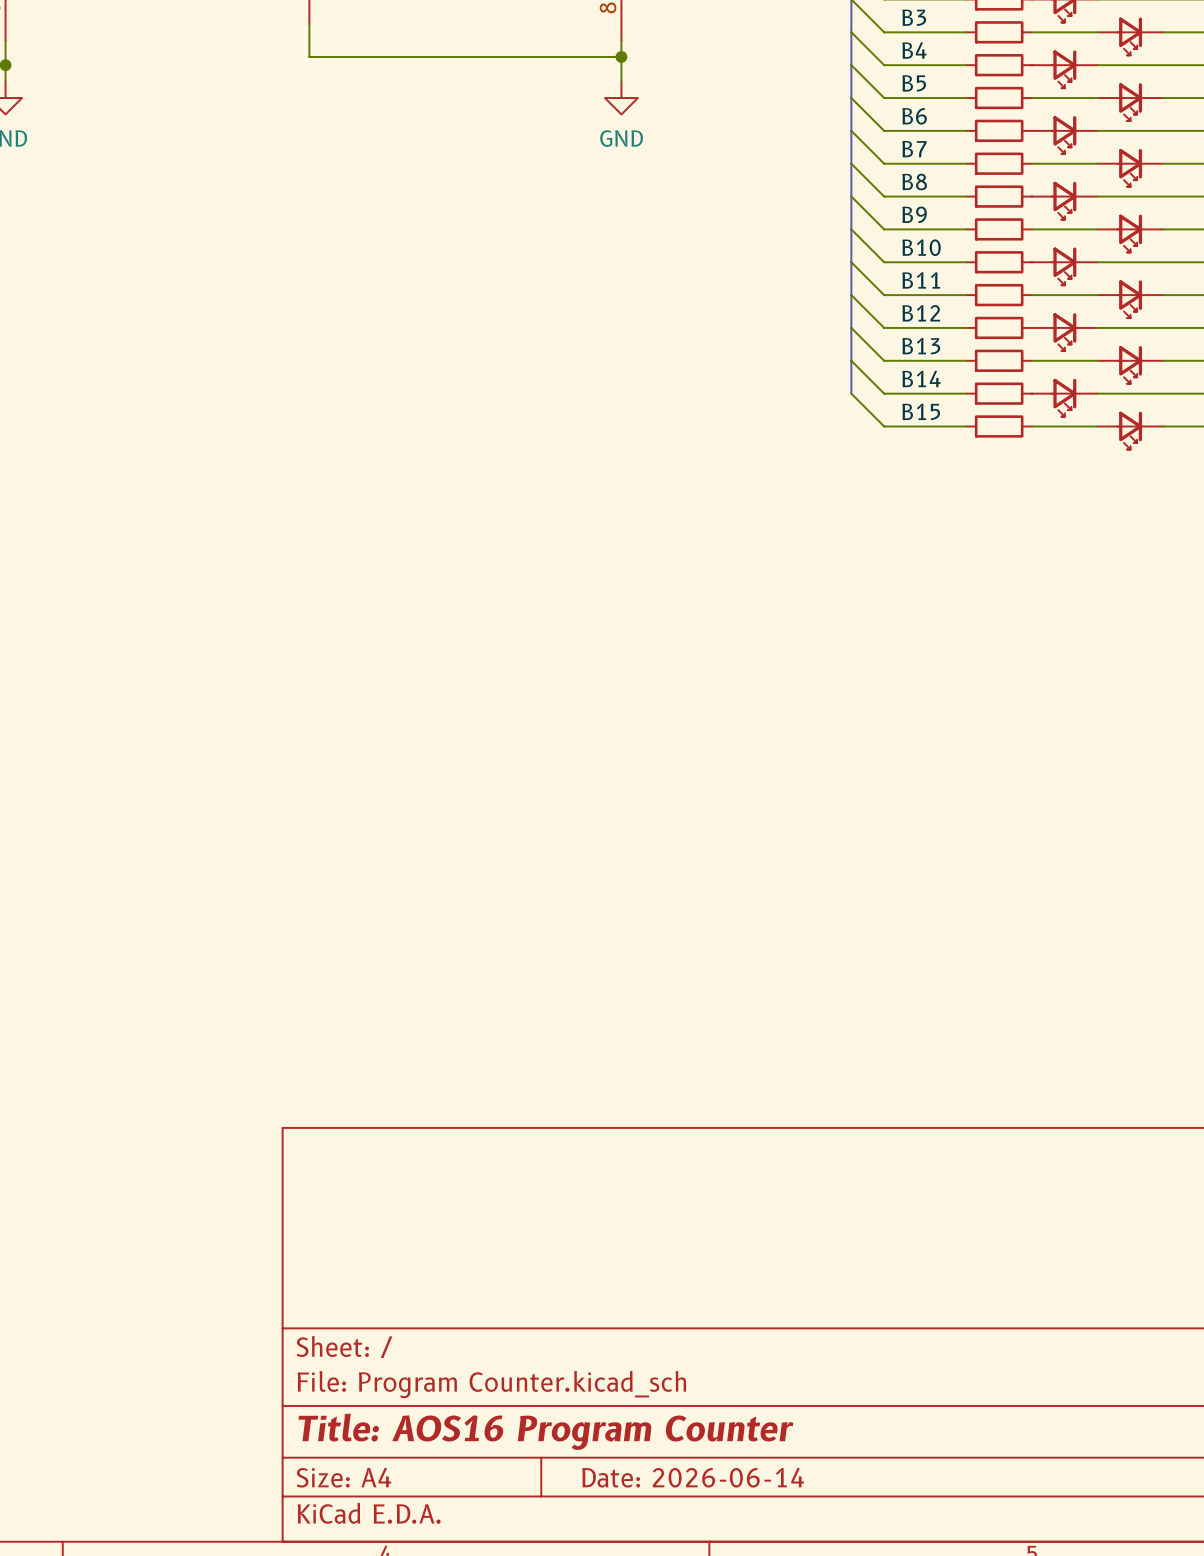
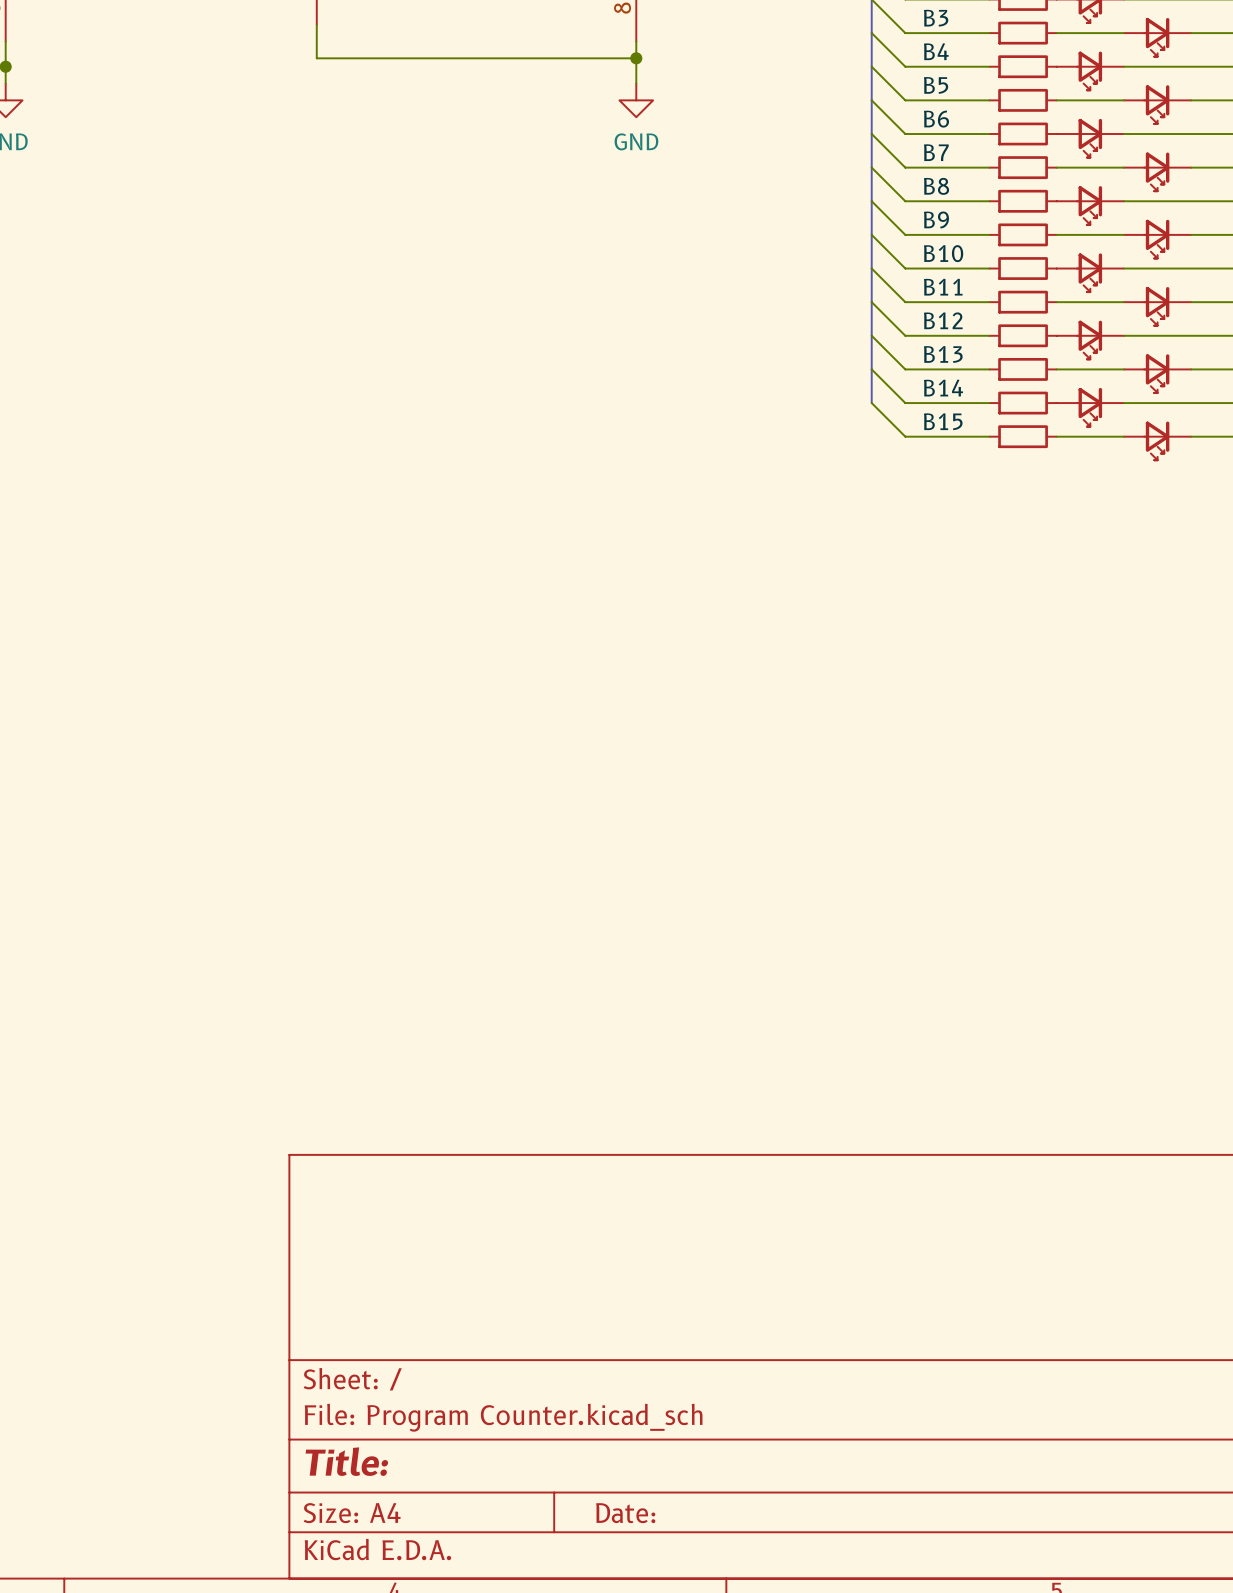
title block: Title: AOS16 Program Counter (545, 1431) -> Title: (346, 1461)
title block: Date: 2026-06-14 (693, 1477) -> Date: (625, 1513)

